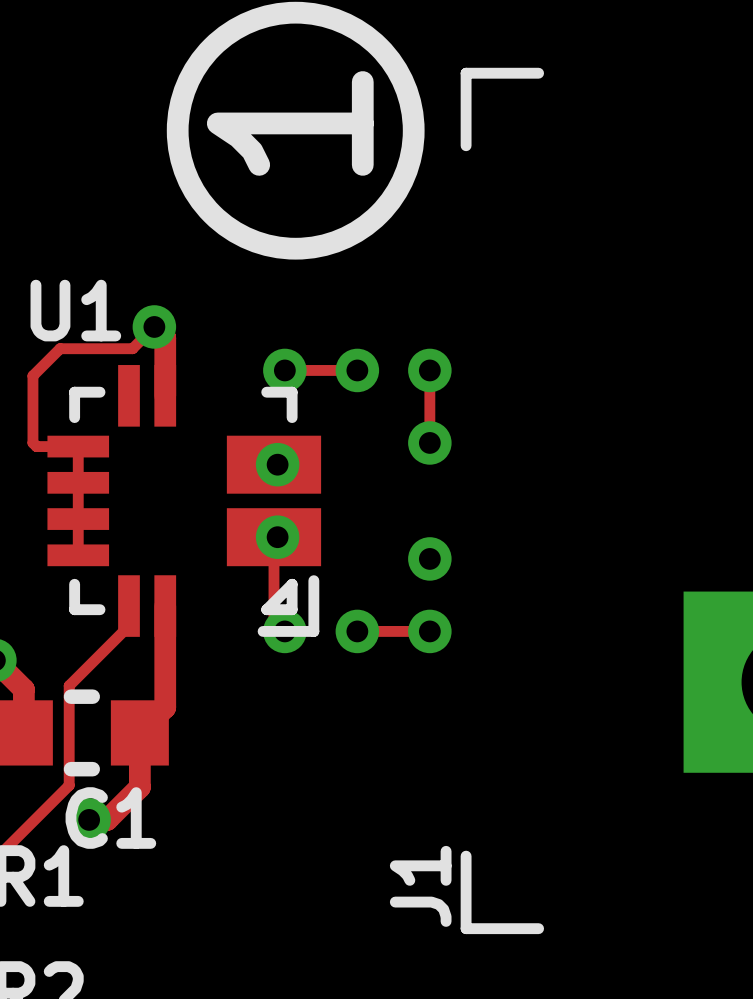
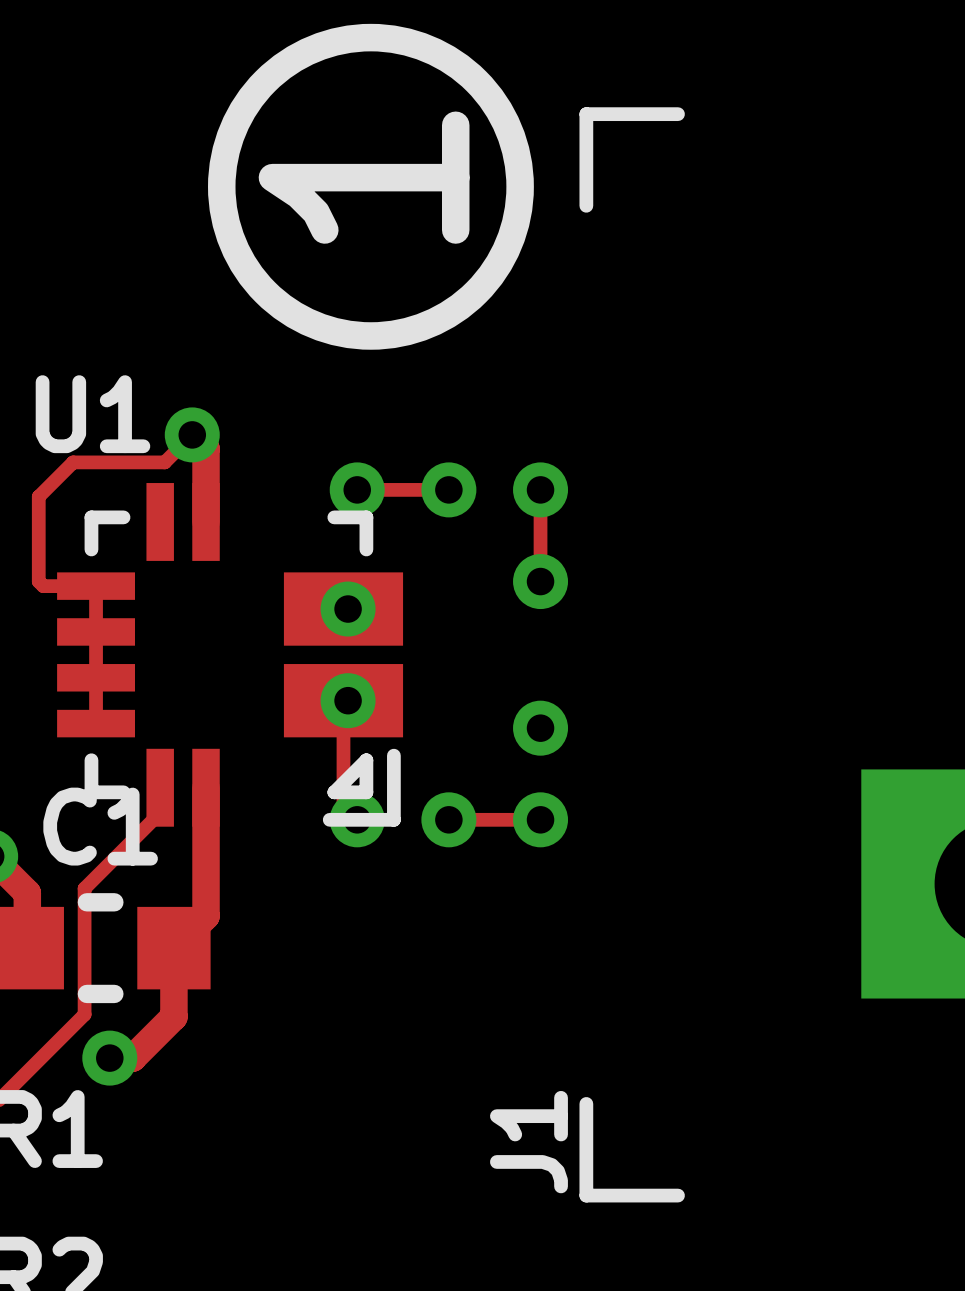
C1 name position: C1 (110, 818) -> C1 (100, 826)

